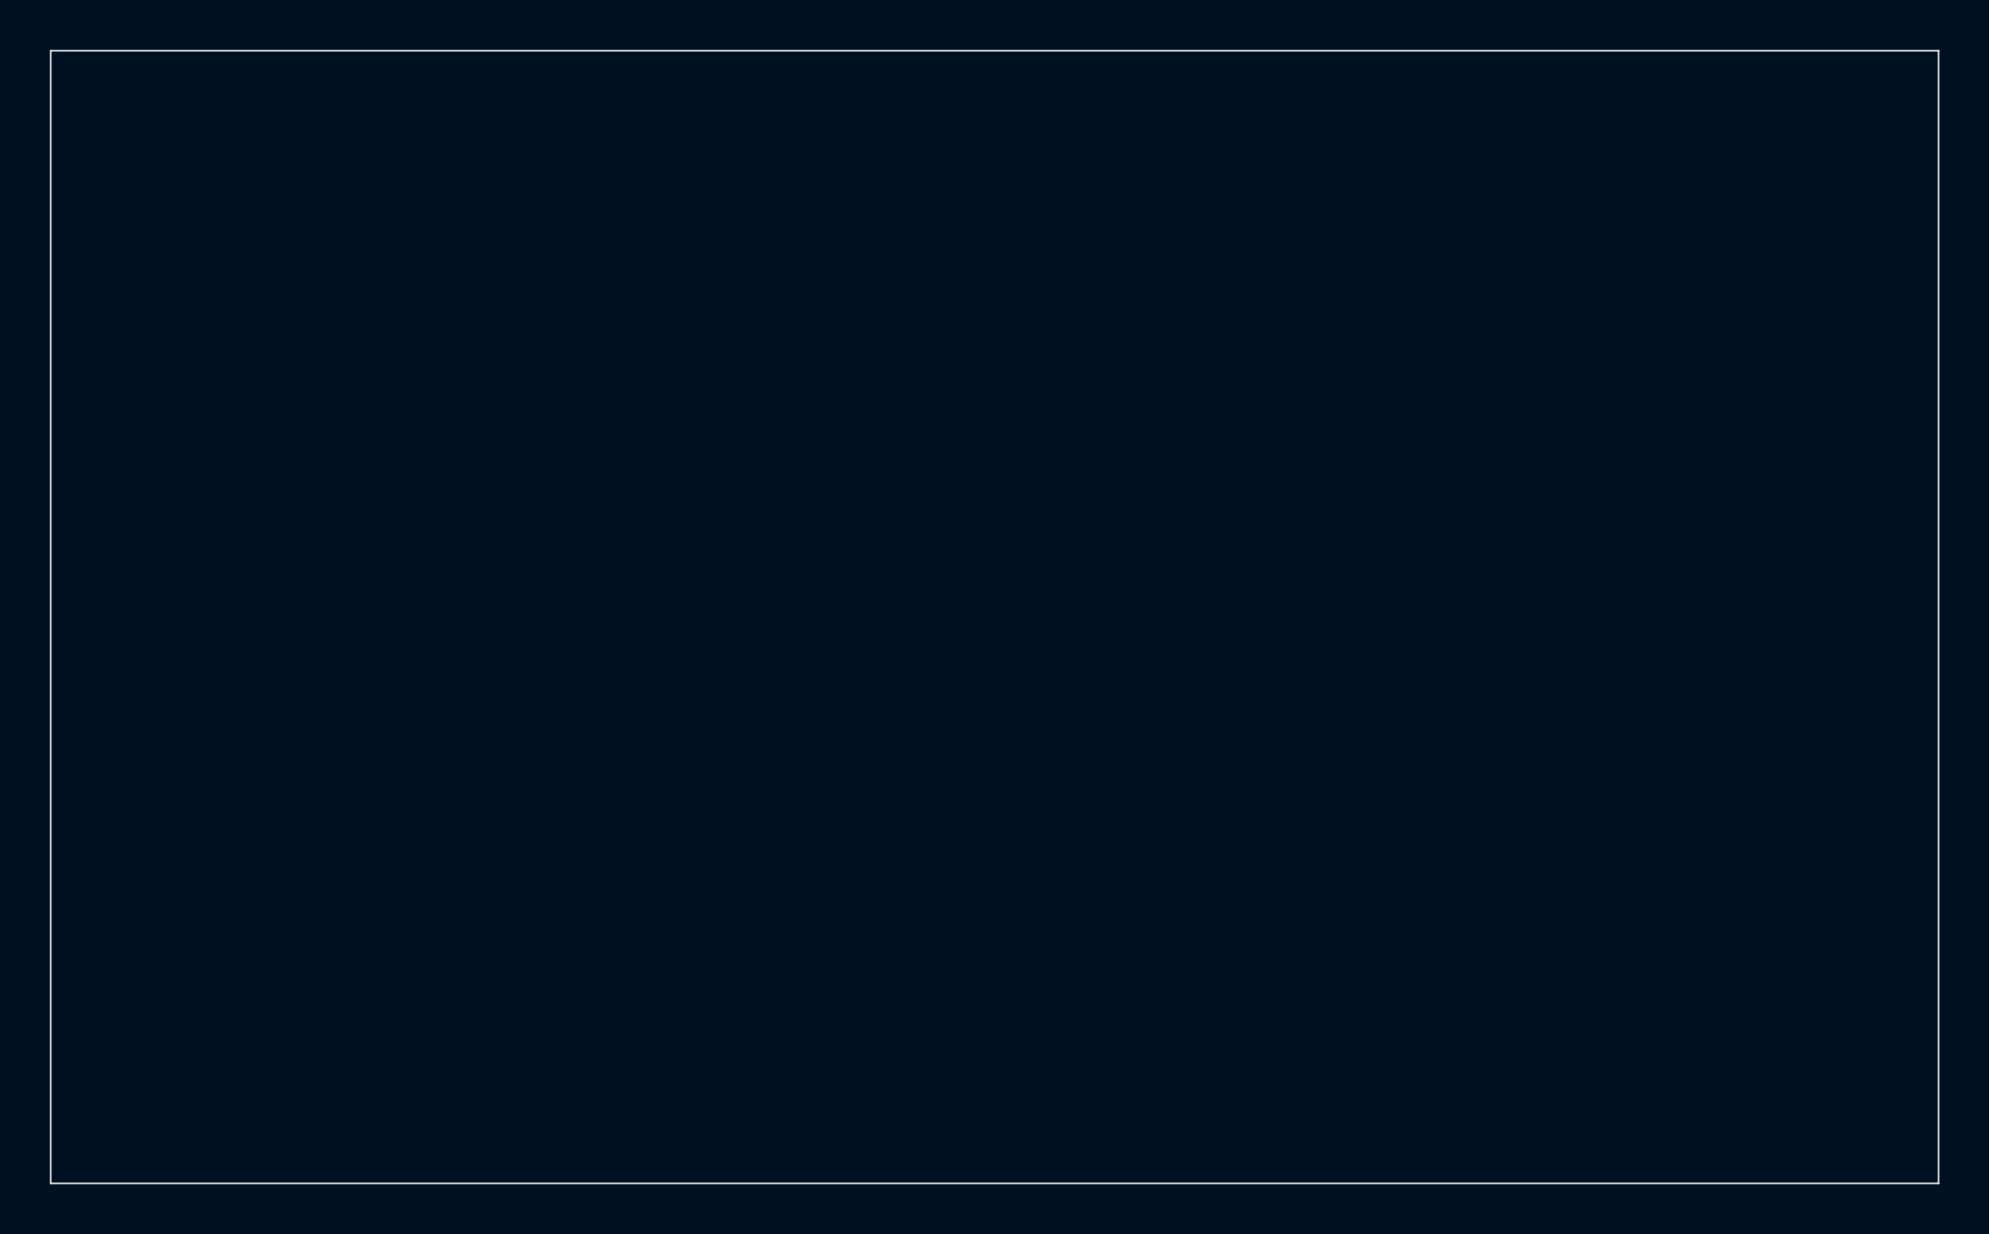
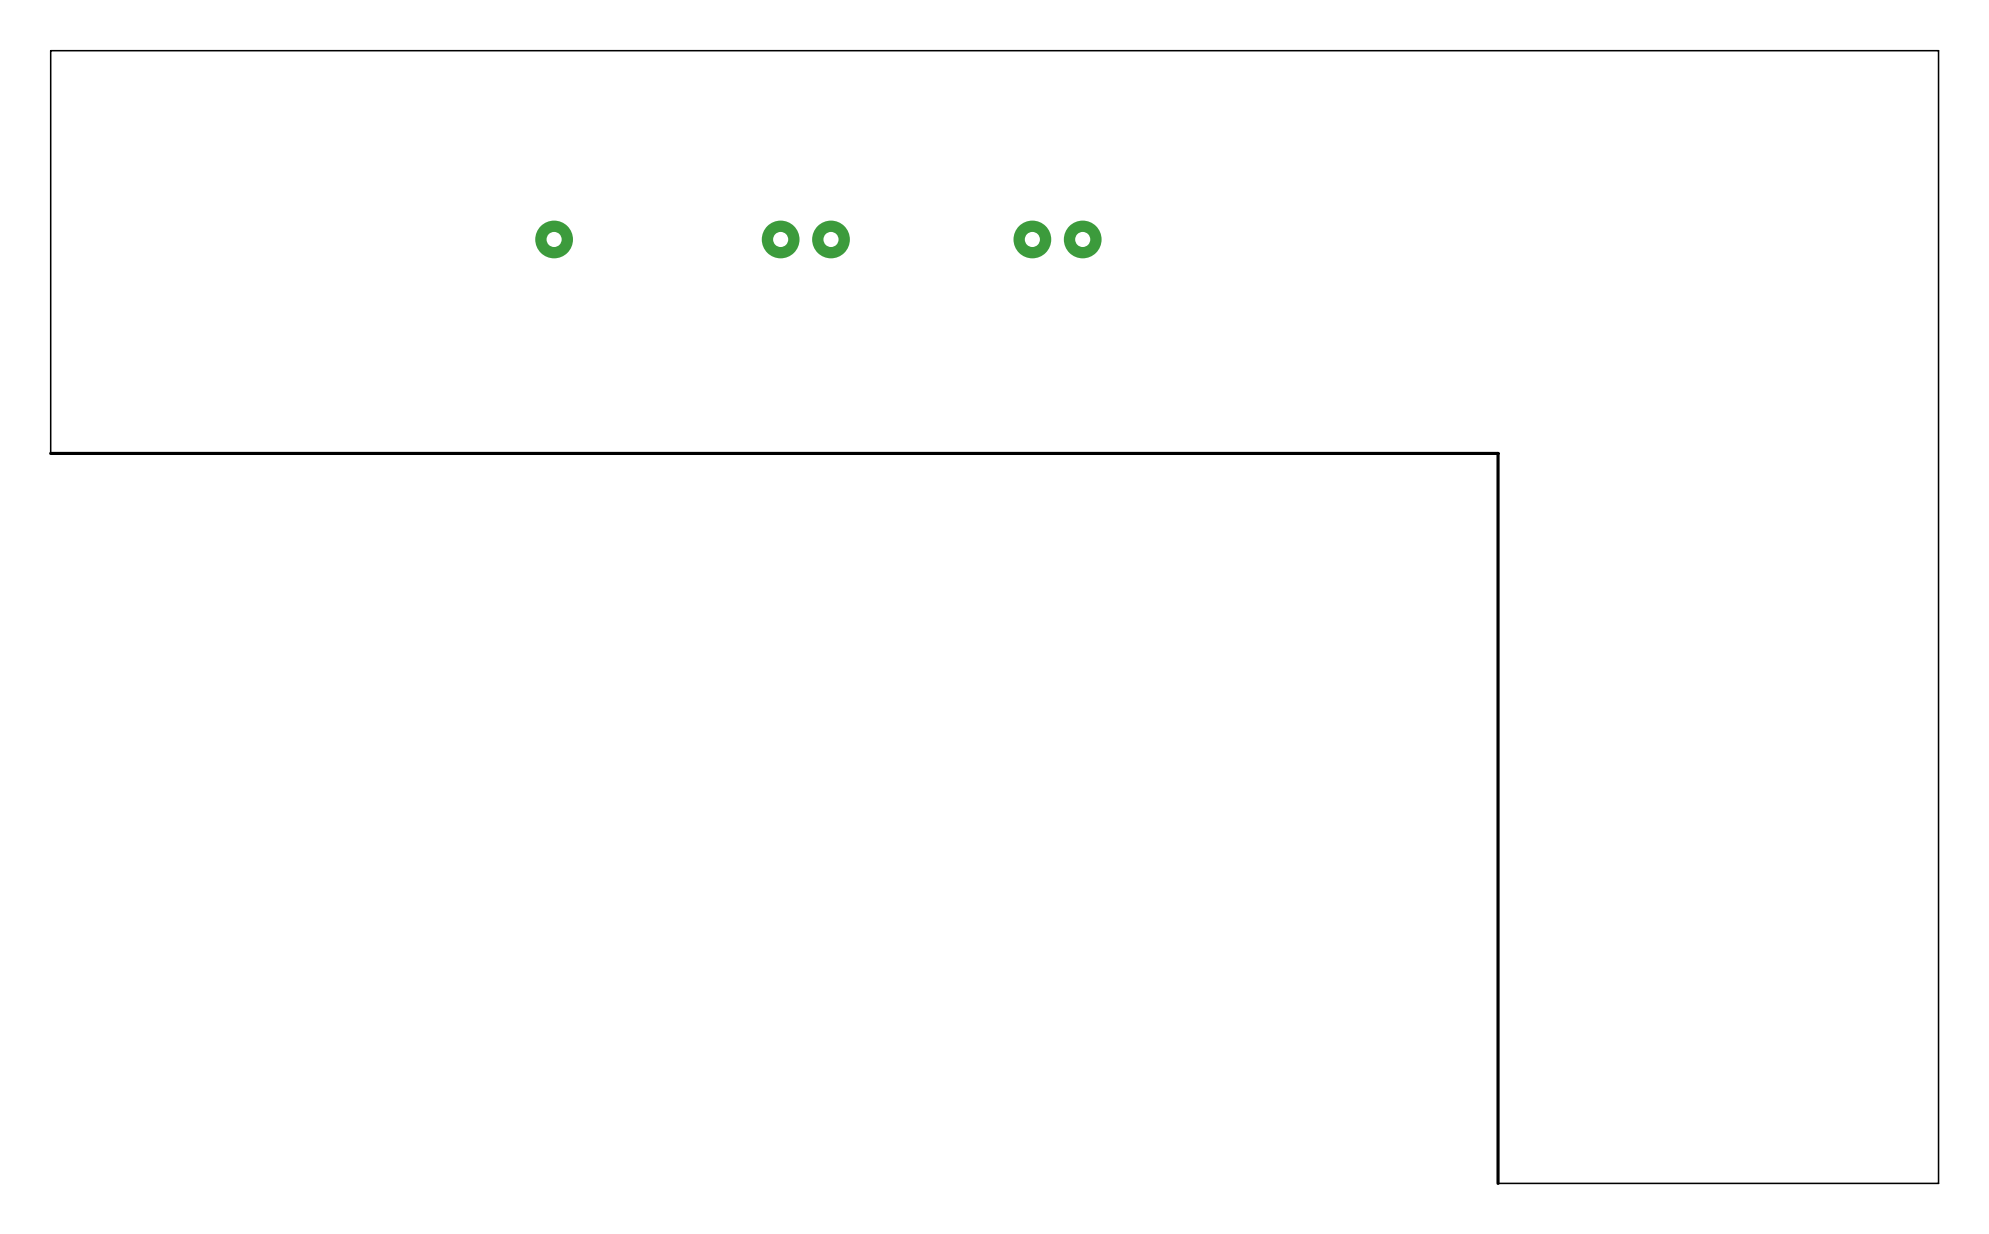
part: none -> (554, 239)
part: none -> (805, 239)
part: none -> (1057, 239)
board edge: (50, 453) (50, 1183) (1498, 1183) -> (50, 453) (1498, 453) (1498, 1183)

